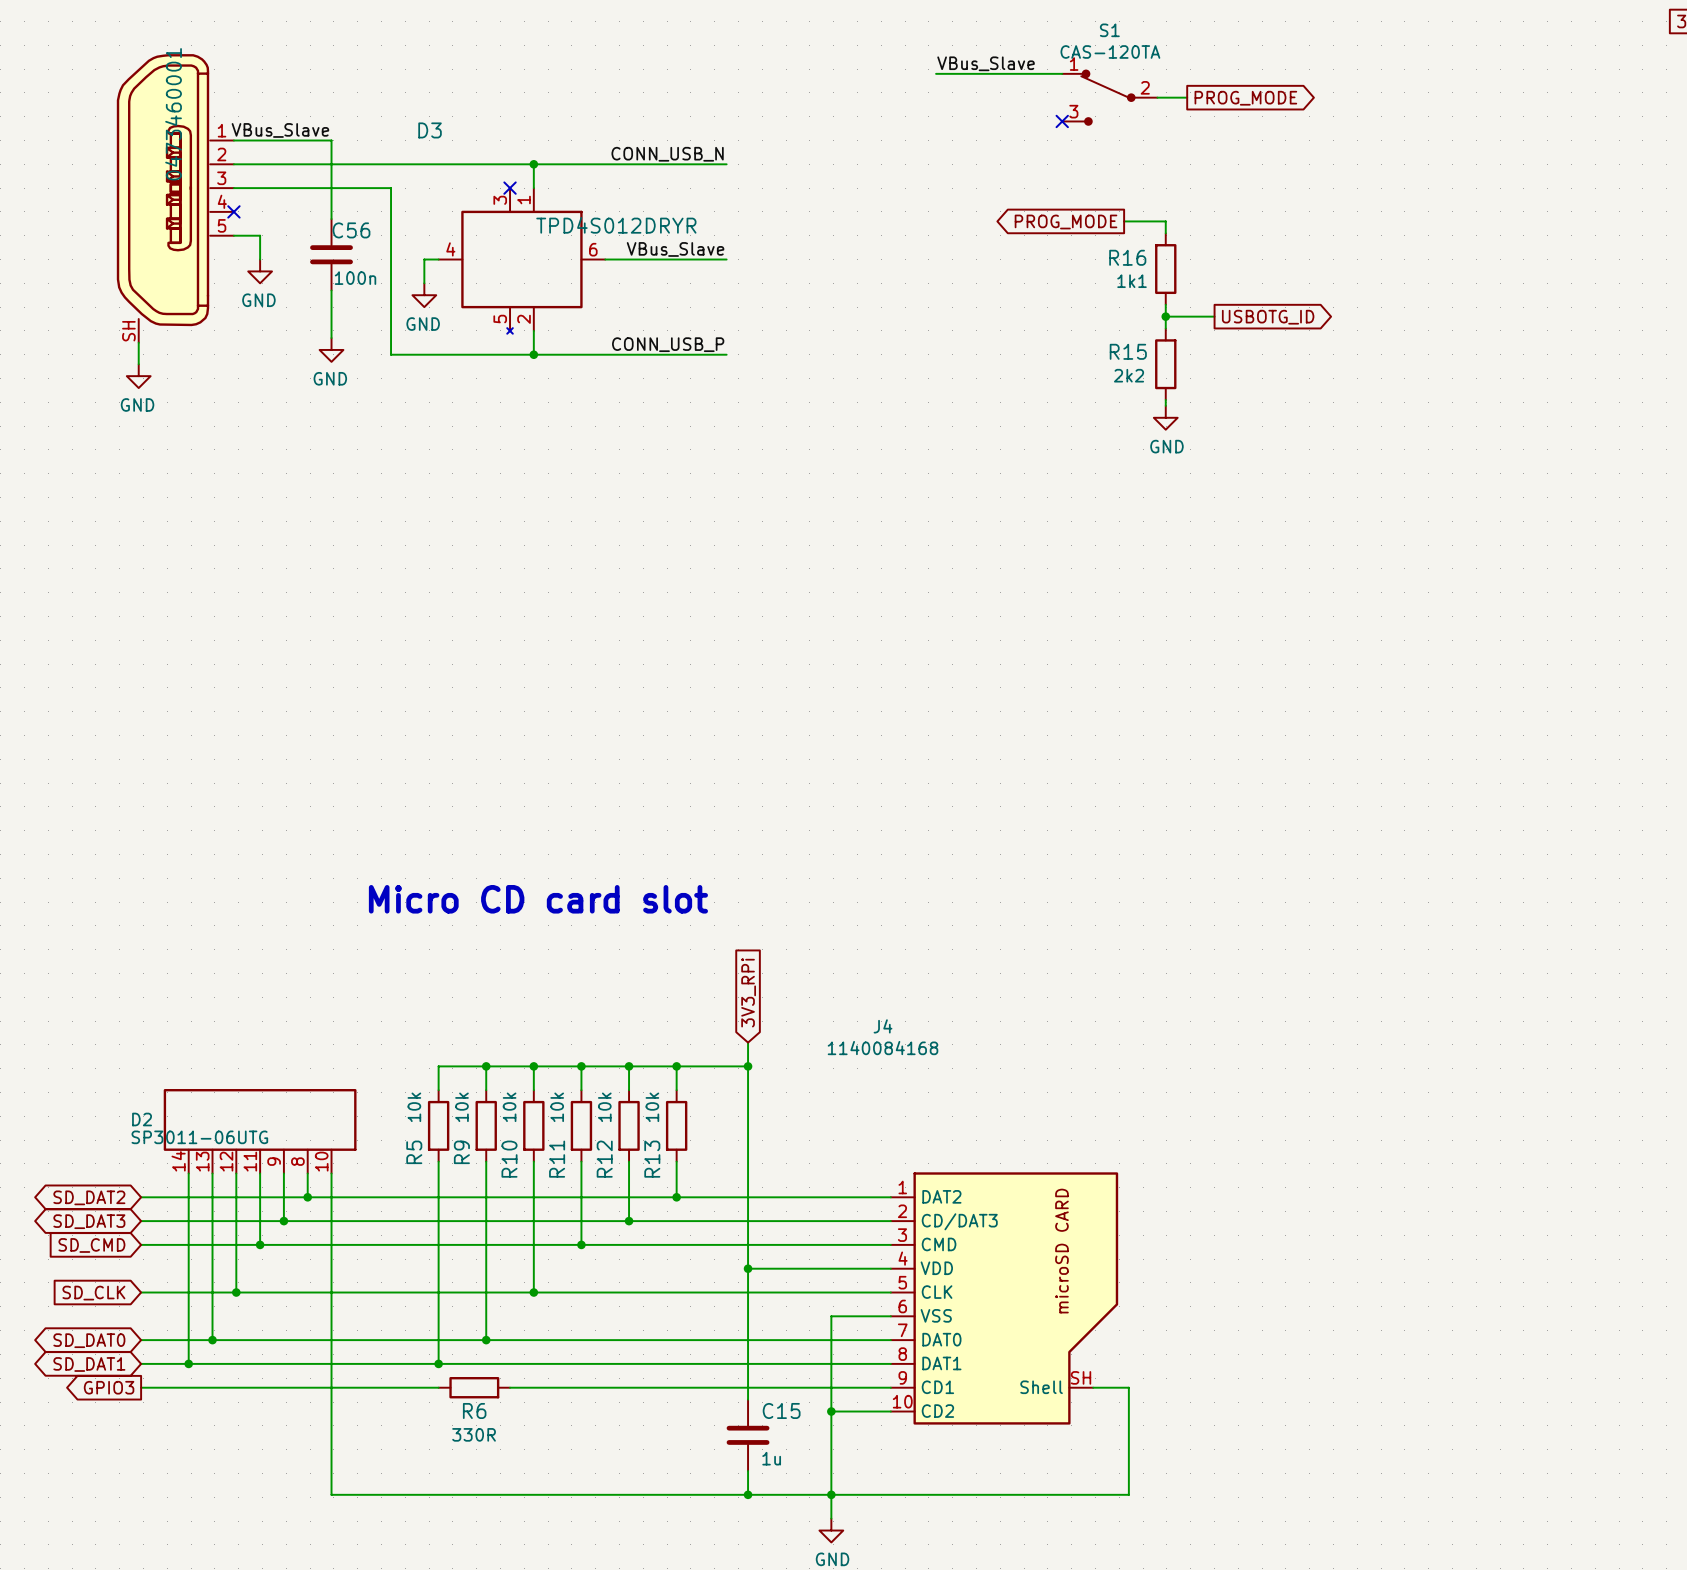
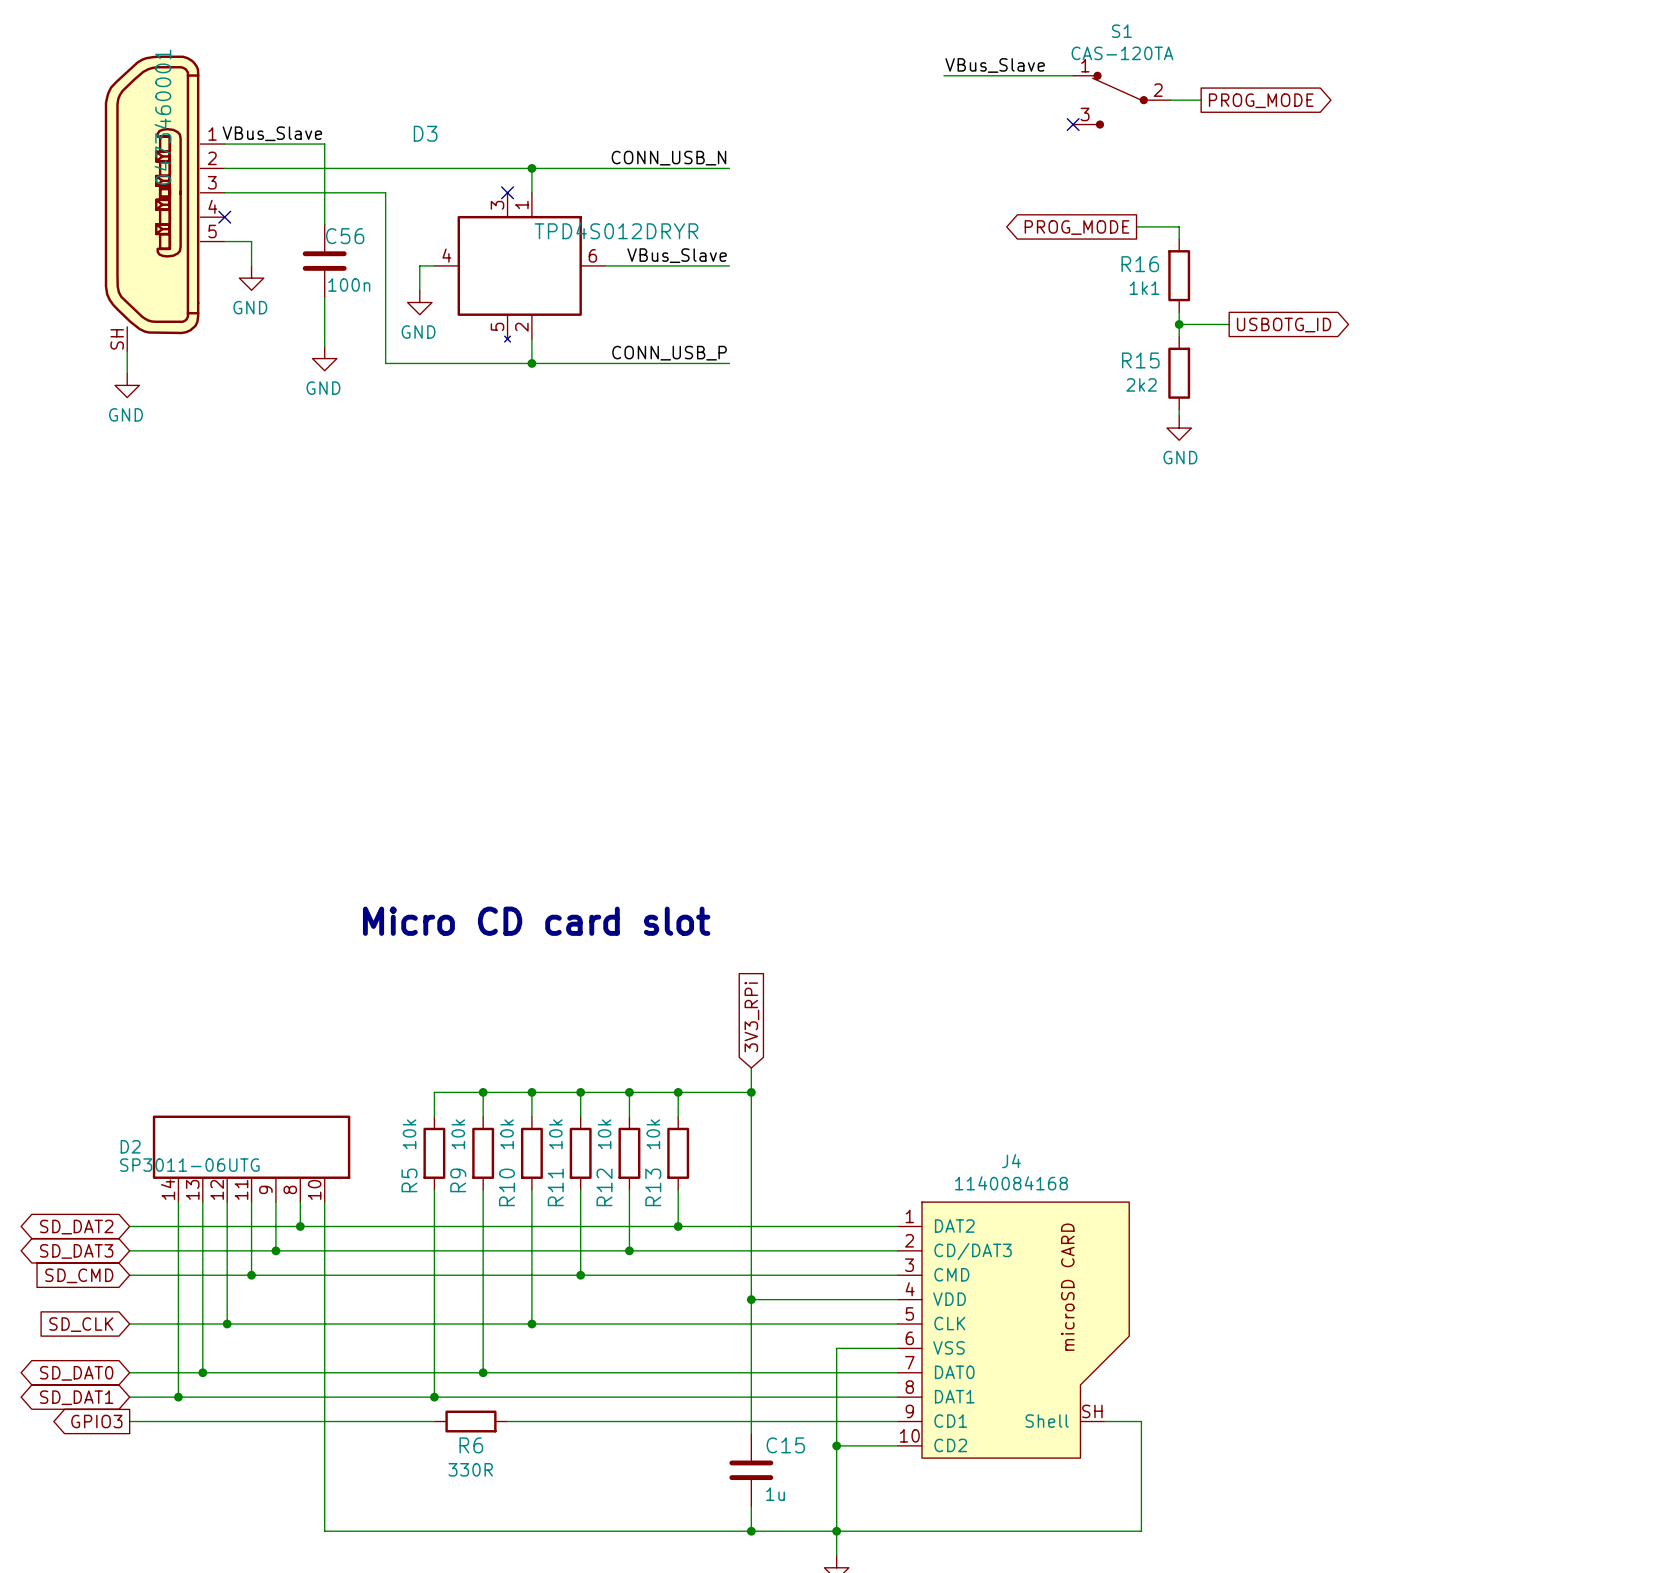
J4 name position: J4 (883, 1026) -> J4 (1011, 1161)
J4 value position: 1140084168 (883, 1048) -> 1140084168 (1011, 1183)
J4 symbol: [890, 1172, 1119, 1425] -> [897, 1202, 1130, 1459]

